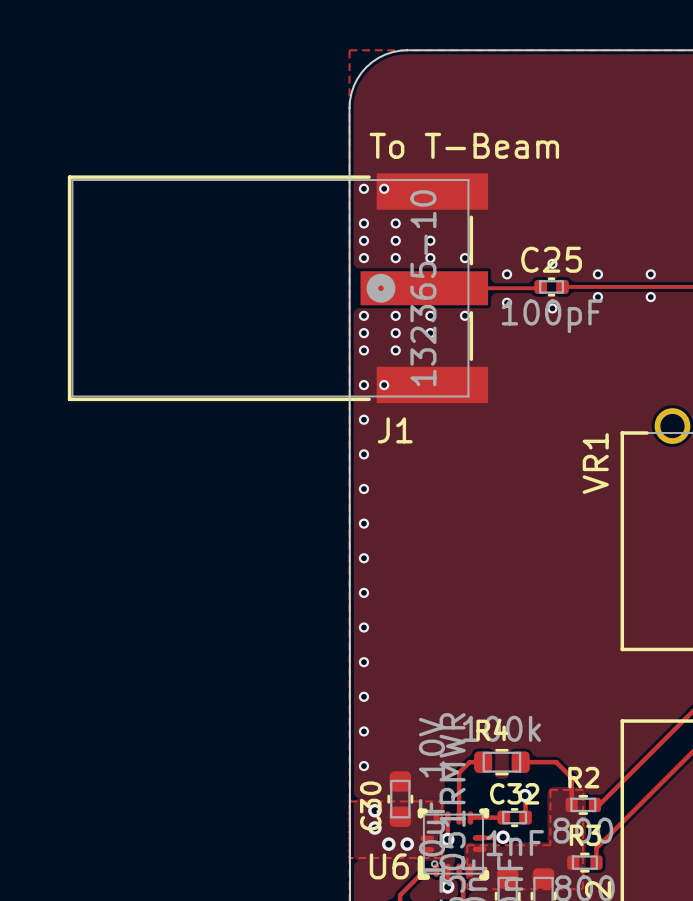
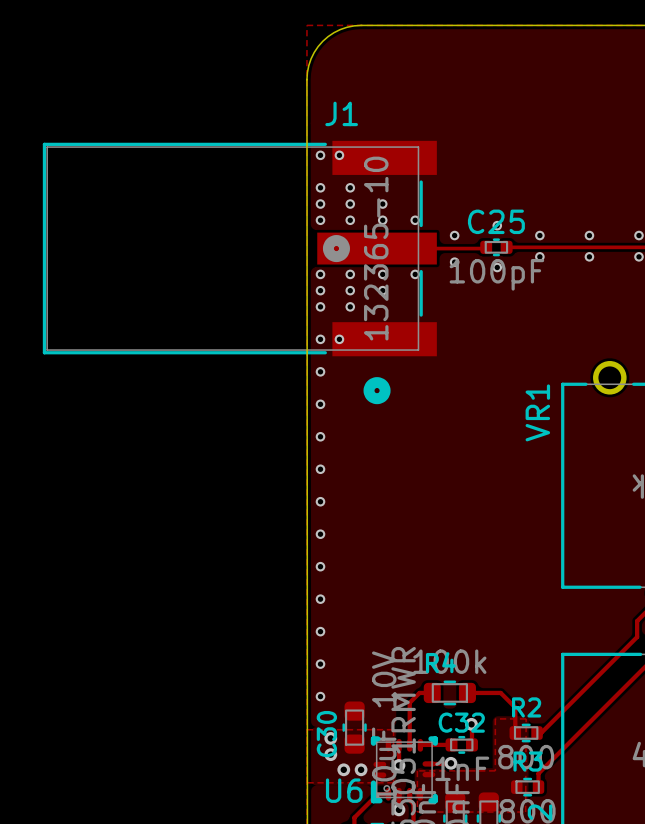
text: To T-Beam (464, 145) -> none
J1 footprint: [67, 173, 489, 404] -> [42, 140, 437, 405]
J1 name position: J1 (395, 430) -> J1 (341, 113)

